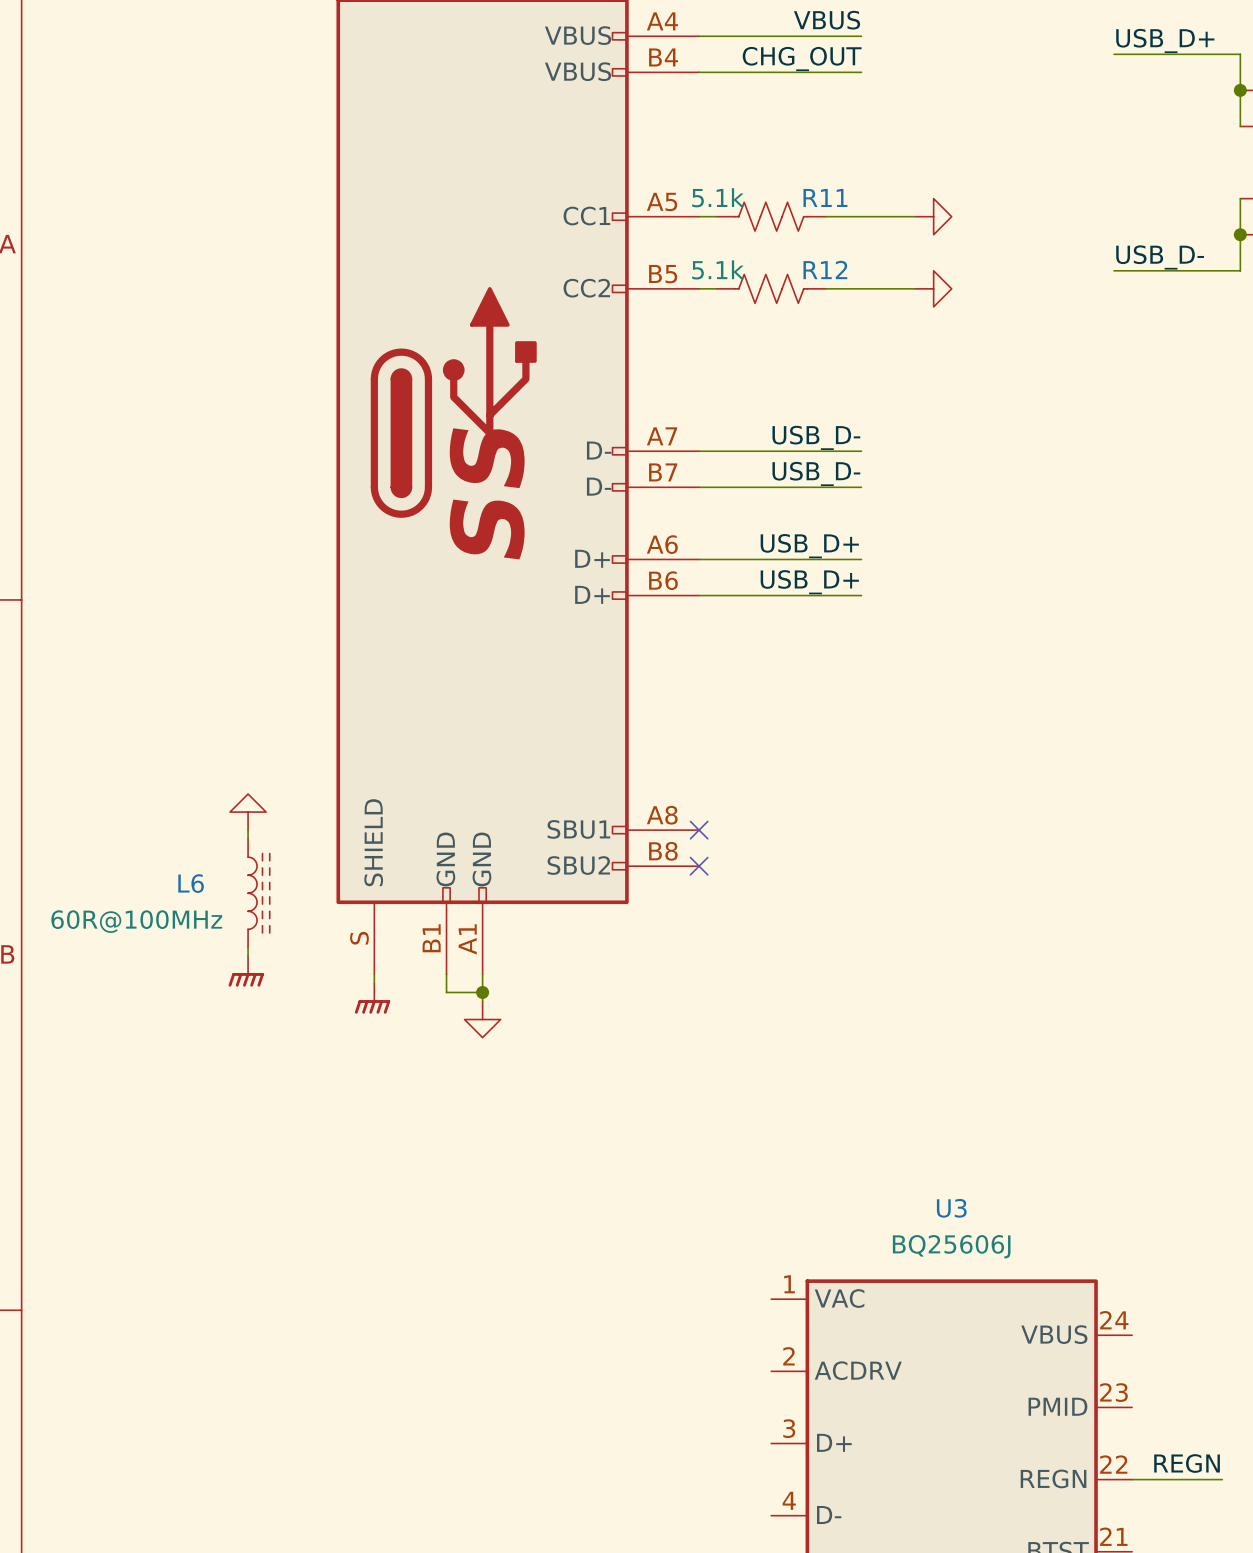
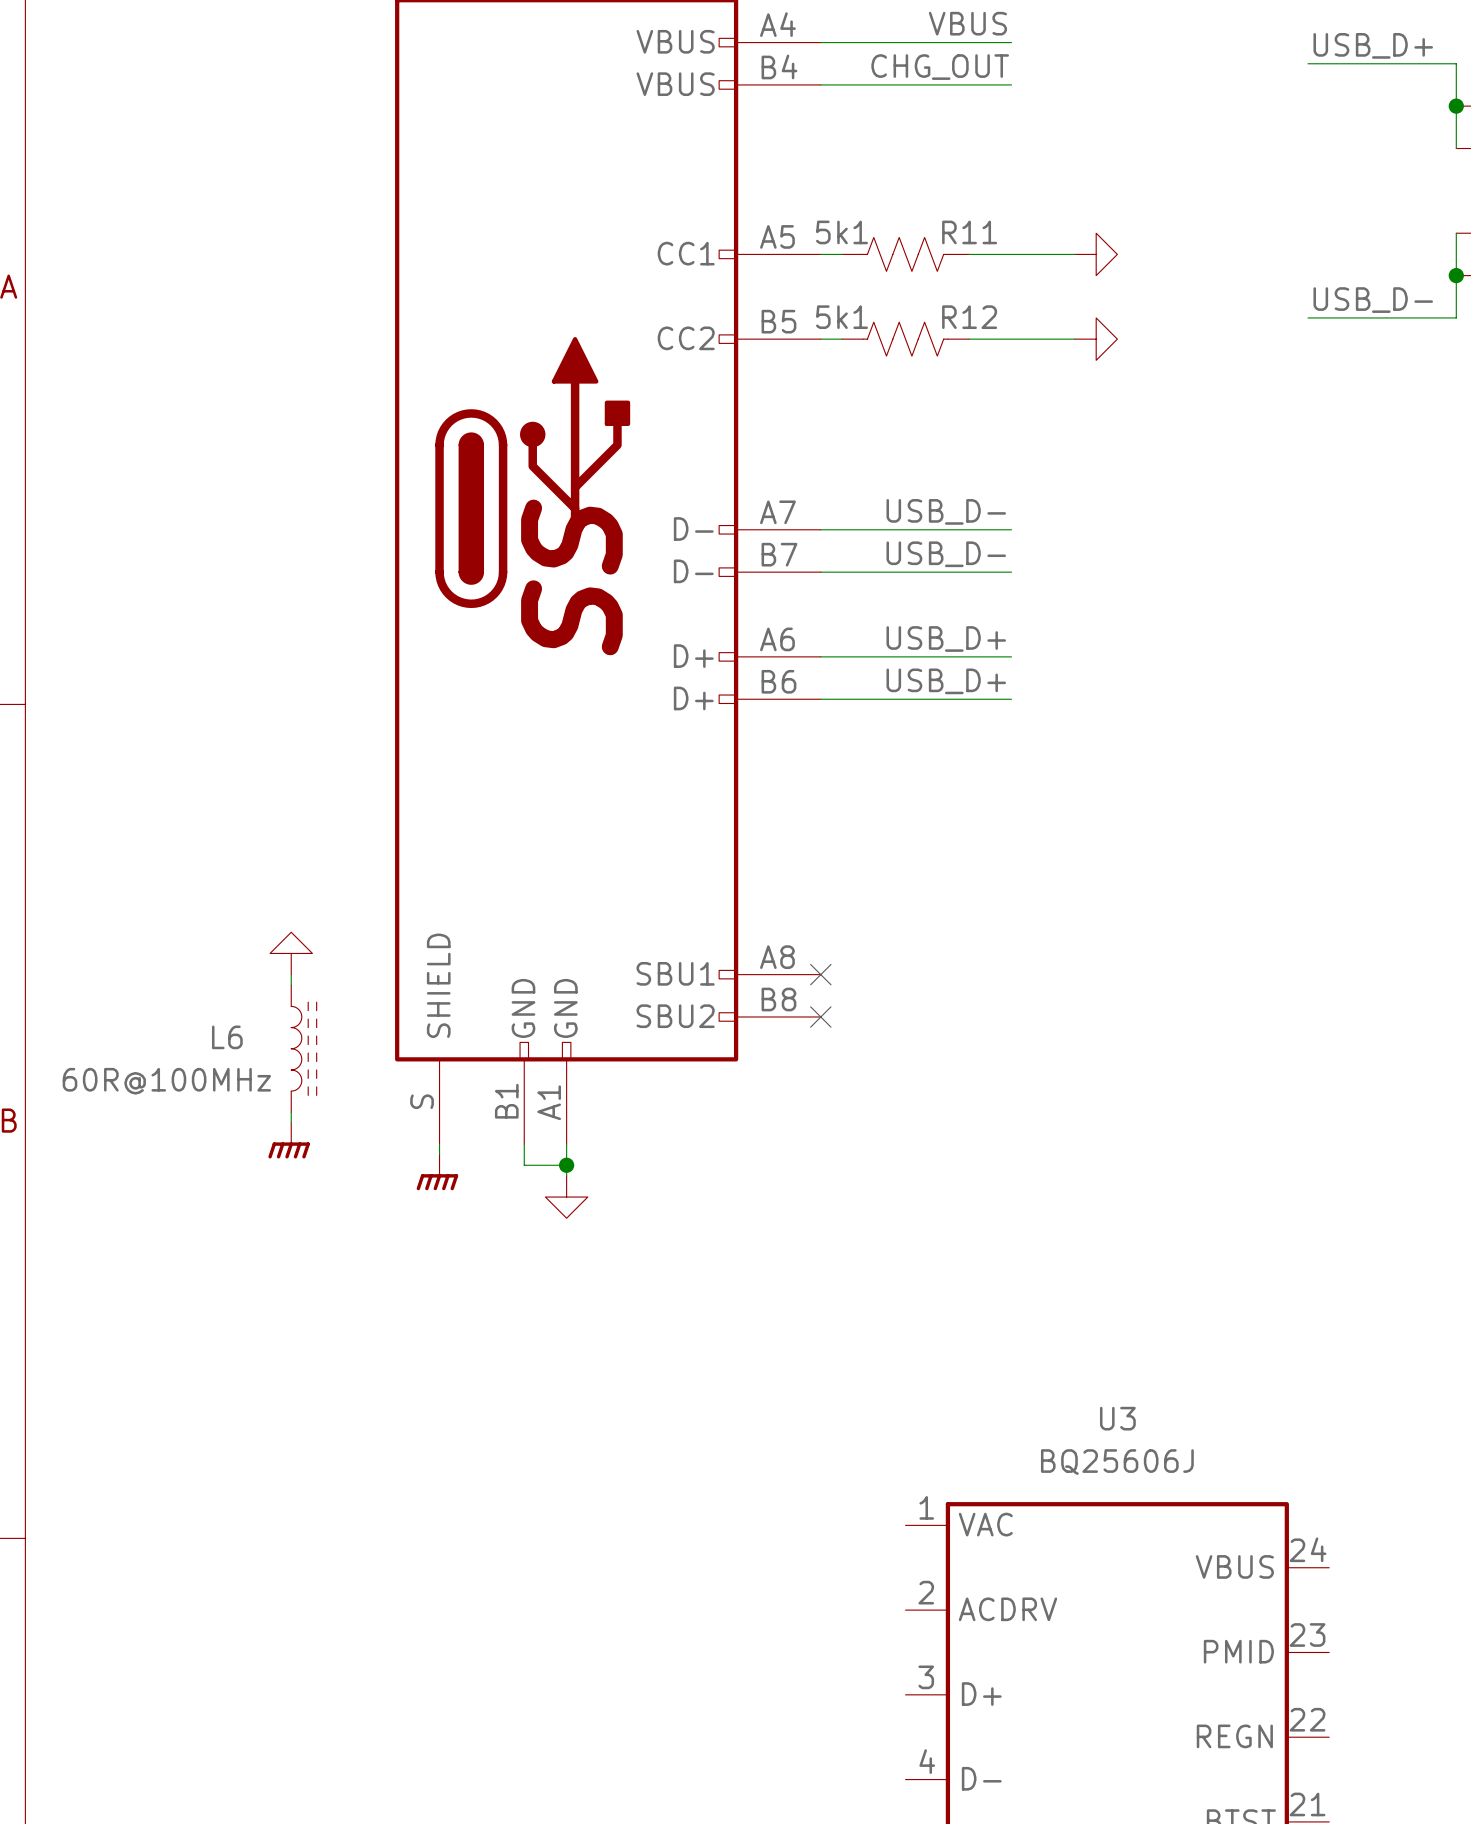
R11 value: 5.1k (718, 197) -> 5k1 (842, 232)
R12 value: 5.1k (718, 269) -> 5k1 (842, 317)
label: REGN (1187, 1463) -> none
wire: (1132, 1479) (1222, 1479) -> none

